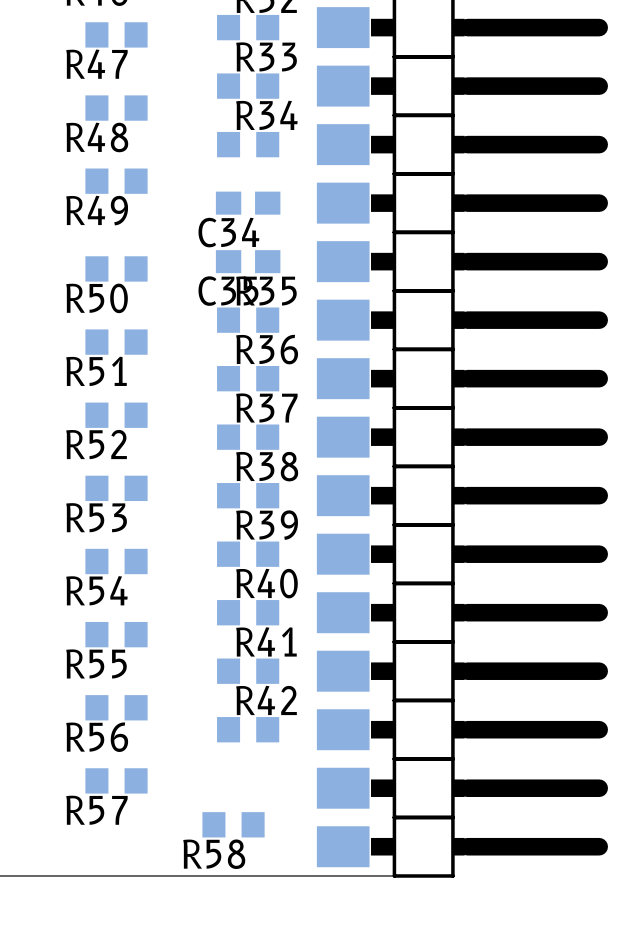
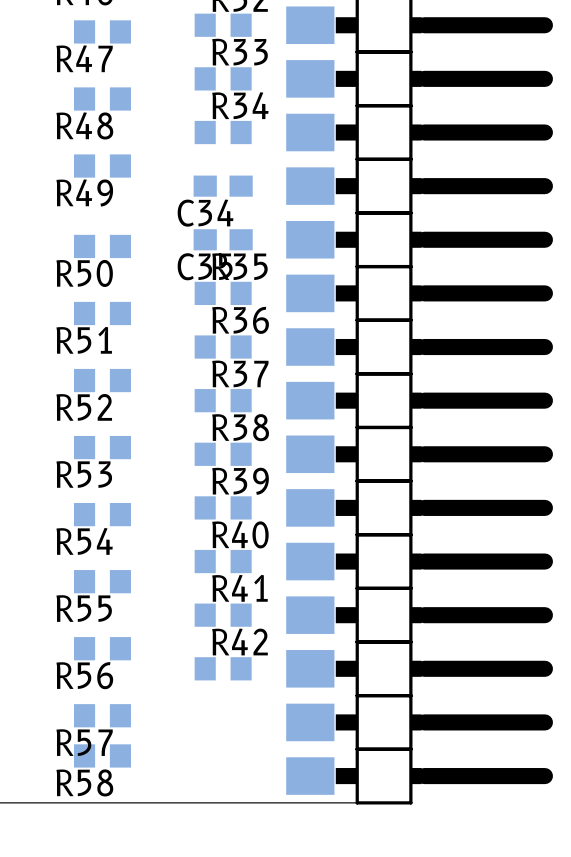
R58 position: (233, 824) -> (102, 755)

